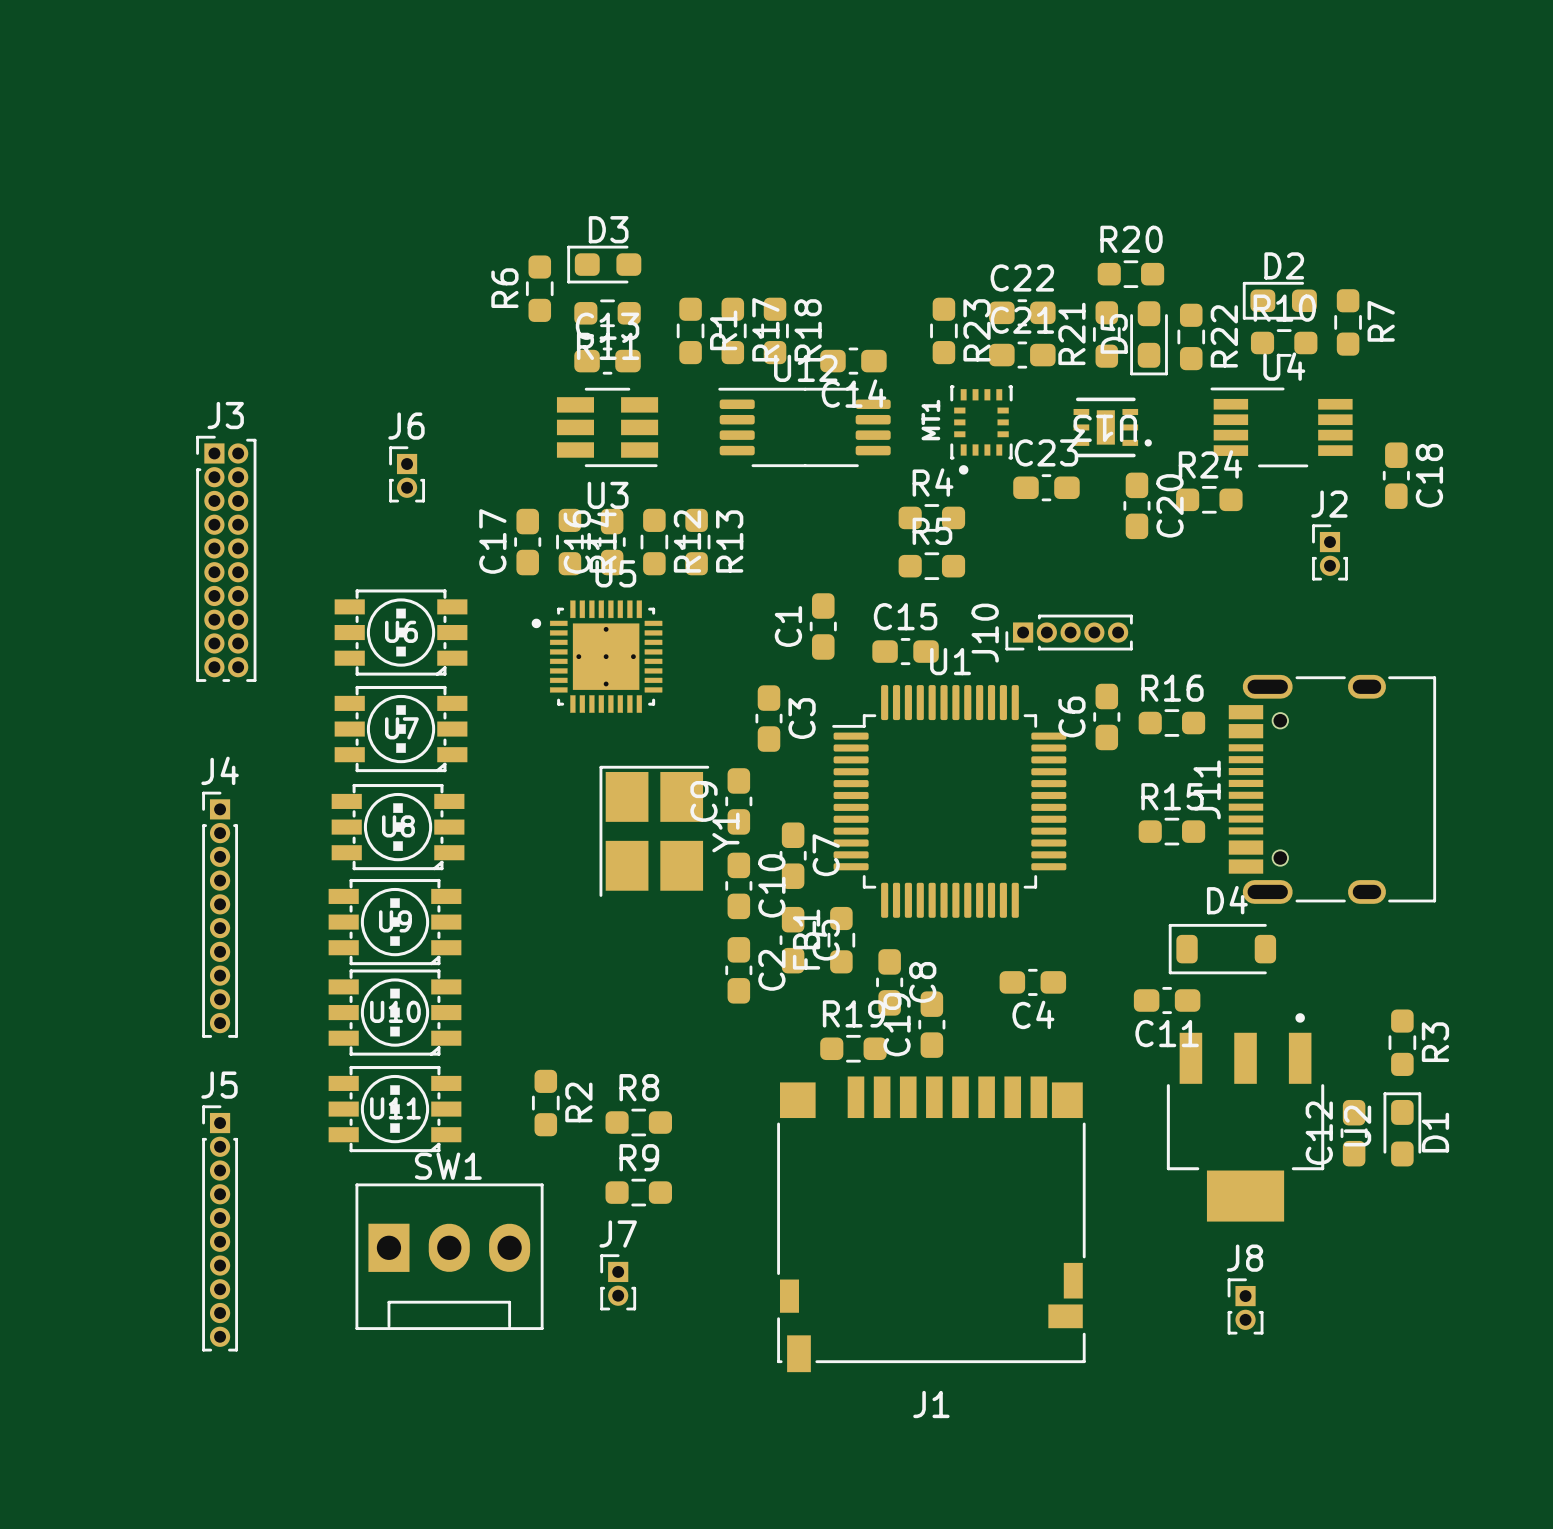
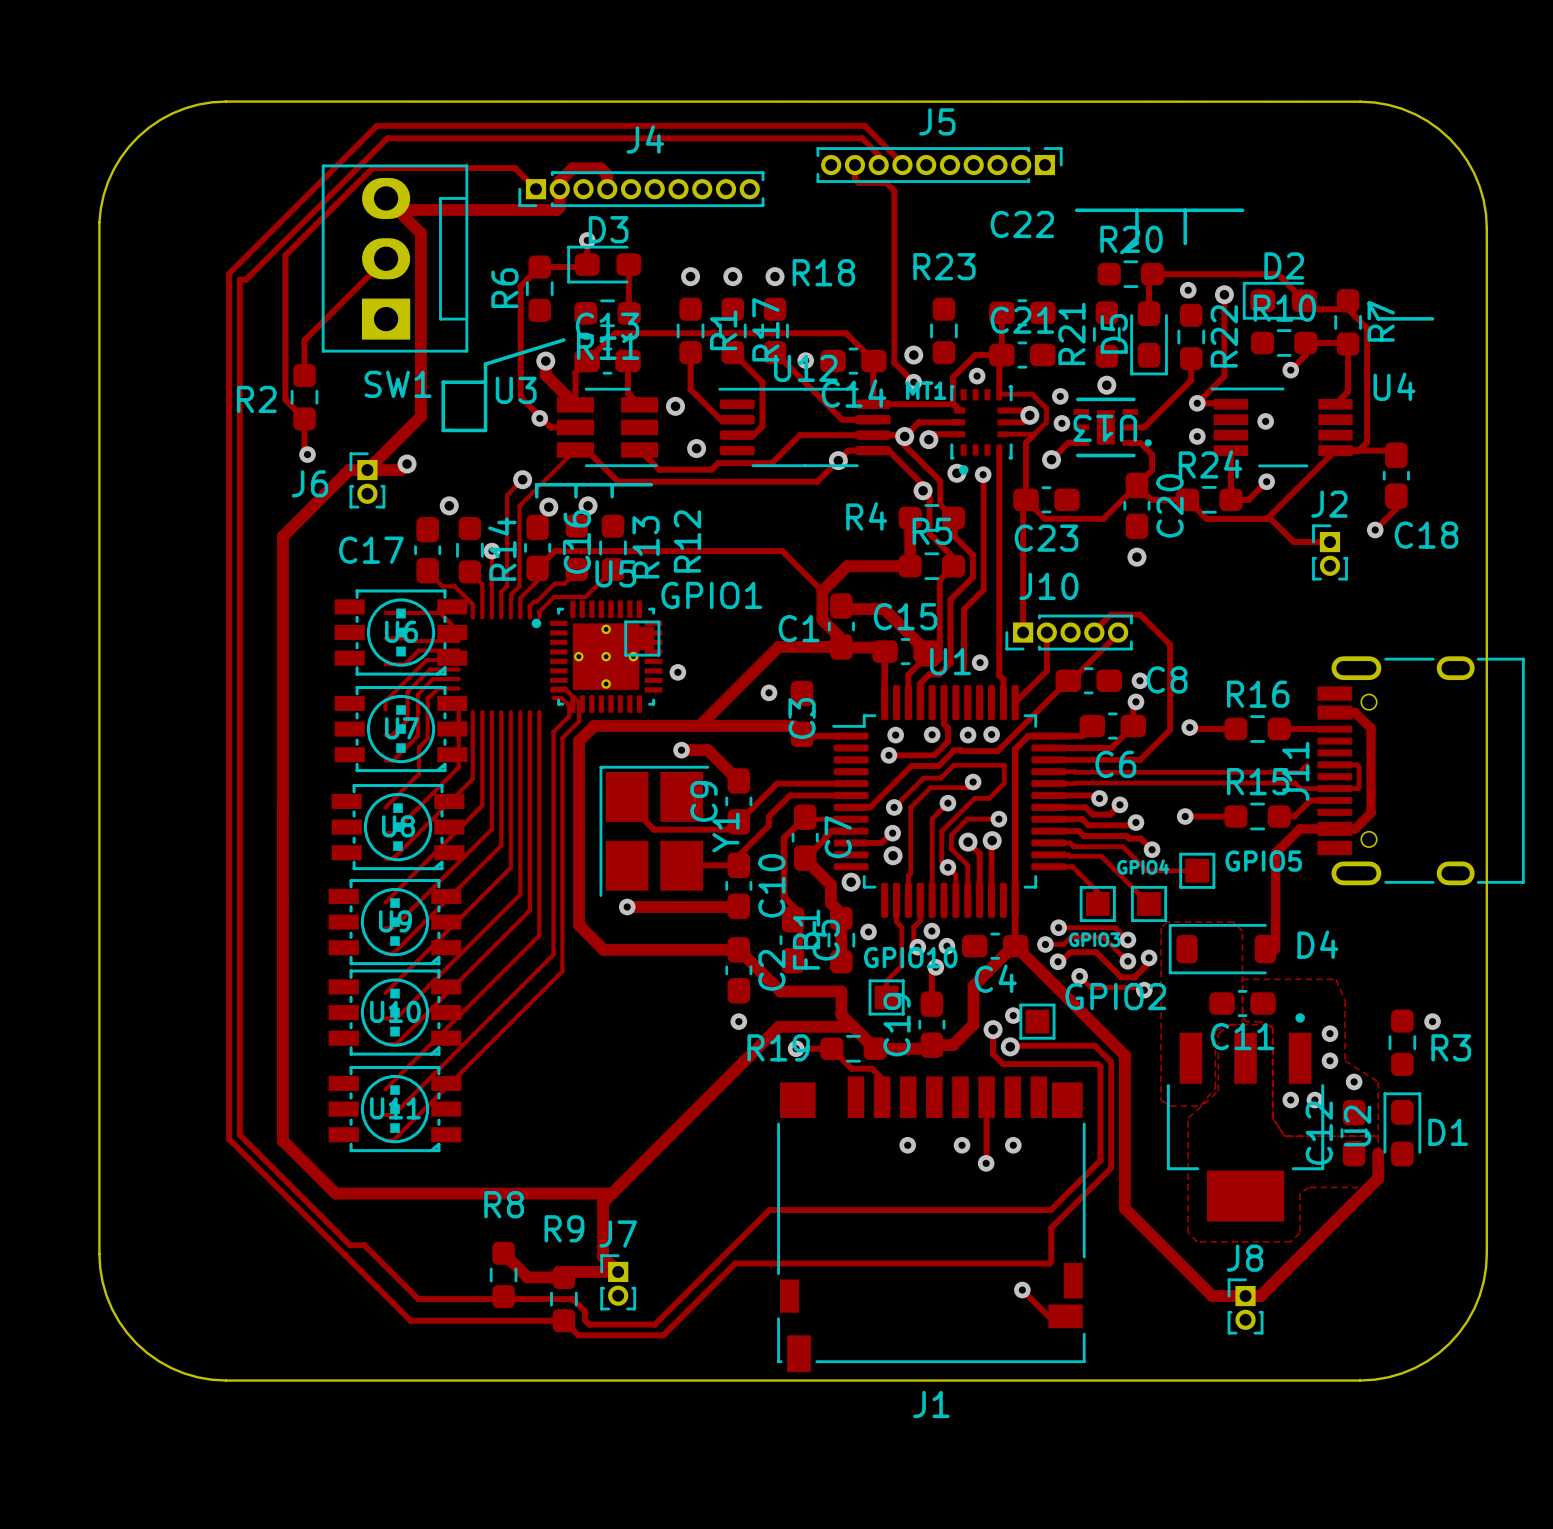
board edge: none -> (226, 101) (1360, 101) (1388, 104) (1401, 108) (1427, 121) (1449, 138) (1467, 160) (1474, 173) (1483, 200) (1486, 228) (1486, 1253) (1483, 1282) (1474, 1308) (1459, 1332) (1449, 1343) (1427, 1361) (1401, 1373) (1374, 1379) (1360, 1380) (226, 1380) (197, 1377) (184, 1373) (158, 1361) (136, 1343) (118, 1321) (111, 1308) (102, 1282) (99, 1253) (99, 222) (108, 182) (120, 157) (138, 136) (172, 113) (198, 104) (226, 101)
track: none -> (854, 165) (854, 179) (858, 182) (886, 182) (894, 190) (894, 362) (913, 382)
track: none -> (878, 165) (878, 154) (862, 138) (387, 138) (246, 279) (239, 279) (239, 1134) (350, 1245) (364, 1245) (418, 1299) (572, 1299) (585, 1311) (585, 1320) (589, 1324) (654, 1324) (769, 1210) (1050, 1210) (1100, 1160) (1100, 1066) (1097, 1064) (1003, 1064) (993, 1053) (993, 1029)
track: none -> (902, 165) (864, 125) (376, 125) (229, 273) (229, 1139) (410, 1320) (563, 1320) (578, 1335) (663, 1335) (735, 1263) (1049, 1263) (1051, 1261) (1051, 1227) (1111, 1167) (1111, 1062) (1094, 1045) (1010, 1046)
track: none -> (536, 189) (514, 168) (372, 168) (285, 255) (285, 399) (304, 418) (304, 451) (307, 454)
track: none -> (607, 189) (607, 174) (600, 168) (572, 168) (559, 181) (559, 206) (556, 209) (397, 209)
track: none -> (386, 198) (420, 233) (420, 416) (367, 470) (349, 470) (282, 536) (282, 1140) (335, 1193) (612, 1193)
line: none -> (1076, 210) (1242, 210)
line: none -> (1136, 210) (1136, 243) (1121, 252)
line: none -> (1185, 210) (1185, 243)
track: none -> (587, 240) (587, 264) (584, 267) (539, 267) (520, 286) (520, 397) (550, 427) (575, 427)
via: none -> (587, 240)
track: none -> (386, 258) (304, 340) (304, 375)
track: none -> (628, 264) (629, 313)
via: none -> (690, 276)
via: none -> (732, 276)
via: none -> (775, 276)
C22 name position: C22 (1022, 277) -> C22 (1022, 224)
via: none -> (1188, 290)
track: none -> (1224, 294) (1224, 376) (1197, 403) (1230, 404)
via: none -> (1224, 294)
line: none -> (1369, 303) (1378, 318) (1432, 318)
track: none -> (1001, 312) (1001, 355) (975, 355) (952, 377) (952, 403) (959, 410)
track: none -> (1149, 313) (1149, 277) (1152, 274) (1277, 274) (1312, 309) (1348, 309) (1367, 328) (1367, 442) (1358, 450)
R18 name rotation: 0° (808, 330) -> 90° clockwise (823, 272)
R23 name rotation: 0° (977, 330) -> 90° clockwise (944, 266)
line: none -> (563, 339) (485, 364) (485, 430) (443, 430) (443, 382) (485, 382)
track: none -> (690, 352) (690, 389) (720, 419) (737, 419)
track: none -> (732, 352) (762, 382) (762, 426) (753, 435) (737, 435)
track: none -> (775, 352) (842, 419) (873, 419)
via: none -> (913, 355)
track: none -> (1191, 358) (1191, 380) (1144, 427) (1130, 427)
via: none -> (805, 360)
track: none -> (545, 361) (545, 375) (575, 404) (575, 372) (614, 333) (846, 333) (873, 361) (873, 404) (953, 404)
via: none -> (545, 361)
track: none -> (628, 361) (628, 393) (639, 404)
track: none -> (999, 363) (999, 394)
U4 name position: U4 (1284, 366) -> U4 (1394, 386)
track: none -> (1290, 370) (1305, 355) (1305, 342) (1338, 342) (1348, 352) (1348, 391) (1335, 404)
via: none -> (1290, 370)
via: none -> (977, 376)
via: none -> (913, 382)
via: none -> (1106, 385)
track: none -> (1000, 394) (1032, 394) (1046, 408) (1046, 422) (1034, 434)
via: none -> (1060, 396)
via: none -> (1197, 403)
via: none -> (675, 406)
track: none -> (1003, 410) (1024, 410) (1029, 415) (1022, 422) (1003, 422)
via: none -> (1029, 415)
via: none -> (539, 418)
MT1 name rotation: 0° (930, 420) -> 90° clockwise (926, 390)
via: none -> (1265, 421)
track: none -> (959, 422) (918, 422) (904, 436)
via: none -> (1061, 423)
J6 name position: J6 (406, 426) -> J6 (309, 483)
track: none -> (959, 434) (934, 434) (928, 439)
track: none -> (1003, 434) (1034, 434)
track: none -> (1034, 434) (1025, 442) (1025, 499)
track: none -> (904, 436) (799, 435) (771, 463) (718, 463) (711, 469) (659, 469) (639, 450)
track: none -> (904, 436) (903, 434) (903, 431) (904, 433) (904, 445) (940, 481) (940, 504) (954, 519) (954, 536) (972, 554) (972, 577) (950, 599) (950, 663) (939, 674) (929, 674) (920, 683) (920, 702)
via: none -> (904, 436)
via: none -> (1197, 436)
via: none -> (928, 439)
track: none -> (1081, 442) (1068, 442) (1051, 459)
track: none -> (1130, 442) (1140, 442) (1152, 454) (1152, 470) (1103, 518) (1044, 518) (1025, 499)
via: none -> (696, 448)
track: none -> (999, 450) (999, 675) (1003, 679) (1003, 702)
track: none -> (1230, 450) (1230, 499)
C23 name position: C23 (1046, 452) -> C23 (1046, 538)
via: none -> (307, 454)
track: none -> (1396, 455) (1391, 450) (1335, 450) (1267, 518)
via: none -> (1051, 459)
via: none -> (838, 460)
track: none -> (407, 464) (401, 470) (370, 470)
via: none -> (407, 464)
via: none -> (956, 473)
J6 position: (407, 474) -> (367, 480)
track: none -> (983, 474) (983, 589) (964, 609) (964, 669)
via: none -> (983, 474)
C18 name rotation: 0° (1429, 475) -> 90° clockwise (1426, 535)
track: none -> (522, 479) (507, 495) (507, 586) (501, 591) (501, 617)
via: none -> (522, 479)
track: none -> (1266, 481) (1248, 499) (1231, 499)
via: none -> (1266, 481)
R4 name position: R4 (932, 482) -> R4 (866, 516)
line: none -> (575, 484) (575, 496)
line: none -> (612, 484) (612, 496)
line: none -> (651, 484) (536, 484) (536, 496)
track: none -> (1136, 485) (1151, 499) (1187, 499) (1206, 518) (1270, 518) (1293, 542) (1329, 542)
C23 position: (1046, 487) -> (1046, 499)
via: none -> (923, 490)
U3 name position: U3 (608, 495) -> U3 (516, 390)
track: none -> (1396, 496) (1396, 508) (1375, 529)
track: none -> (1025, 499) (1023, 502) (1023, 632)
via: none -> (449, 505)
via: none -> (588, 505)
via: none -> (548, 507)
track: none -> (910, 517) (910, 566) (847, 566) (822, 591)
via: none -> (1375, 529)
C17 name rotation: 0° (492, 541) -> 90° clockwise (371, 550)
C17 position: (527, 542) -> (427, 550)
R14 position: (569, 542) -> (469, 550)
C16 position: (612, 542) -> (537, 547)
R12 position: (654, 542) -> (576, 547)
R13 position: (696, 542) -> (613, 547)
track: none -> (491, 551) (491, 617)
via: none -> (491, 551)
via: none -> (1136, 557)
J3: (226, 558) -> none
track: none -> (576, 569) (564, 583) (554, 583) (529, 605) (529, 617)
track: none -> (613, 569) (585, 596) (554, 596) (539, 611) (539, 617)
track: none -> (427, 570) (442, 586) (454, 586) (472, 604) (472, 617)
track: none -> (469, 571) (482, 584) (482, 617)
track: none -> (822, 591) (782, 551) (554, 551) (537, 568) (537, 580) (520, 598) (520, 617)
track: none -> (822, 591) (822, 619) (844, 641) (844, 646) (778, 646) (699, 726)
track: none -> (844, 609) (884, 609) (923, 647) (926, 647)
track: none -> (385, 612) (440, 612) (458, 631)
track: none -> (510, 617) (511, 594) (519, 586) (519, 506) (575, 450) (586, 450) (618, 481) (817, 481) (848, 450) (888, 450) (923, 484) (923, 490) (929, 497) (929, 533) (953, 557) (953, 566) (939, 580) (939, 658) (934, 663) (919, 663) (908, 674) (908, 702)
C1 name rotation: 0° (788, 626) -> 90° clockwise (799, 628)
C1 position: (823, 626) -> (841, 626)
track: none -> (1046, 632) (1046, 670) (1015, 702)
track: none -> (1094, 632) (1110, 614) (1140, 614) (1170, 644) (1170, 729) (1140, 759) (1048, 759)
track: none -> (1118, 632) (1071, 680) (1068, 680) (997, 751) (954, 750) (938, 766) (911, 766) (870, 807) (850, 807)
J10 name rotation: 0° (985, 633) -> 90° clockwise (1048, 586)
track: none -> (385, 638) (406, 638) (409, 641) (458, 641)
GPIO1: none -> (642, 638)
track: none -> (458, 650) (418, 650) (405, 664) (385, 664)
track: none -> (844, 650) (846, 647) (881, 647) (885, 651)
track: none -> (884, 651) (884, 702)
track: none -> (458, 660) (426, 660) (385, 701) (385, 709)
via: none -> (980, 662)
track: none -> (458, 669) (429, 669) (407, 692) (407, 720) (392, 735) (385, 735)
via: none -> (677, 672)
track: none -> (458, 679) (433, 679) (418, 694) (418, 735) (393, 760) (385, 760)
via: none -> (1139, 680)
track: none -> (458, 688) (438, 688) (427, 698) (427, 738) (419, 747) (419, 773) (385, 807)
track: none -> (553, 688) (564, 688) (578, 702) (578, 721) (562, 738) (562, 971) (393, 1140) (385, 1140)
via: none -> (768, 692)
track: none -> (458, 698) (458, 767) (393, 833) (385, 833)
track: none -> (553, 698) (561, 698) (569, 705) (569, 716) (553, 732) (553, 954) (393, 1115) (385, 1115)
track: none -> (1135, 701) (1133, 704) (1133, 726) (1111, 748) (1048, 748)
via: none -> (1135, 701)
track: none -> (944, 702) (944, 724) (948, 728) (948, 741) (934, 755) (888, 755)
track: none -> (472, 712) (472, 779) (393, 858) (385, 858)
track: none -> (482, 712) (482, 805) (385, 902)
track: none -> (491, 712) (491, 829) (393, 928) (385, 928)
track: none -> (501, 712) (501, 845) (393, 953) (385, 953)
track: none -> (510, 712) (510, 867) (385, 992)
track: none -> (520, 712) (520, 894) (396, 1018) (385, 1018)
track: none -> (529, 712) (529, 910) (396, 1044) (385, 1044)
track: none -> (539, 712) (539, 935) (385, 1089)
track: none -> (1334, 712) (1355, 712) (1370, 728) (1370, 813) (1355, 828) (1299, 828) (1275, 853) (1275, 949)
C6 name position: C6 (1071, 716) -> C6 (1115, 764)
C6 rotation: 0° (1106, 716) -> 90° clockwise (1112, 726)
C3 position: (768, 718) -> (802, 713)
R16 position: (1171, 723) -> (1257, 729)
track: none -> (1092, 726) (1082, 736) (1028, 736) (1015, 749) (1015, 946)
track: none -> (1189, 727) (1235, 729)
via: none -> (1189, 727)
track: none -> (1279, 729) (1334, 729)
via: none -> (932, 734)
via: none -> (991, 734)
via: none -> (895, 735)
via: none -> (968, 735)
track: none -> (851, 736) (803, 736) (793, 726) (594, 726) (578, 741) (578, 925) (603, 949) (738, 949) (780, 991) (841, 992)
track: none -> (681, 750) (708, 750) (738, 780)
via: none -> (681, 750)
via: none -> (888, 755)
track: none -> (1307, 764) (1299, 772) (1048, 771)
track: none -> (1334, 764) (1356, 764) (1359, 767) (1357, 788) (1334, 788)
J4 name position: J4 (220, 770) -> J4 (645, 139)
track: none -> (973, 782) (967, 787) (930, 787) (910, 807) (910, 873) (908, 875) (908, 900)
via: none -> (973, 782)
track: none -> (851, 783) (777, 783) (731, 829) (653, 829) (627, 802) (627, 796)
track: none -> (1048, 783) (1295, 783) (1300, 788) (1334, 788)
J11 position: (1332, 789) -> (1421, 770)
track: none -> (851, 795) (790, 795) (768, 816) (768, 825) (738, 855) (738, 865) (681, 865)
track: none -> (1048, 795) (1096, 795) (1099, 798)
via: none -> (1099, 798)
track: none -> (1334, 800) (1310, 800) (1294, 816) (1279, 816)
track: none -> (947, 803) (932, 818) (932, 900)
via: none -> (947, 803)
track: none -> (1119, 804) (1110, 814) (1092, 814) (1085, 807) (1048, 807)
via: none -> (1119, 804)
track: none -> (894, 807) (923, 778) (940, 778) (953, 765) (1004, 765) (1004, 783) (989, 798) (974, 798) (941, 831) (941, 861) (955, 875) (955, 900)
via: none -> (894, 807)
track: none -> (1185, 816) (1235, 816)
via: none -> (1185, 816)
track: none -> (851, 819) (807, 819) (805, 817) (784, 838) (784, 897) (799, 913) (799, 946)
track: none -> (998, 819) (967, 819) (951, 835) (951, 849) (967, 865) (967, 900)
via: none -> (998, 819)
track: none -> (1048, 819) (1082, 819) (1088, 825) (1133, 825) (1135, 822)
via: none -> (1135, 822)
track: none -> (851, 831) (831, 831) (825, 838) (804, 859) (799, 859) (805, 859) (830, 885) (830, 903) (841, 913) (841, 948)
track: none -> (1048, 831) (1078, 831) (1083, 836) (1126, 836) (1129, 838) (1140, 838) (1152, 849)
R15 position: (1171, 831) -> (1257, 816)
track: none -> (892, 833) (881, 842) (851, 842)
via: none -> (892, 833)
track: none -> (992, 840) (991, 900)
via: none -> (992, 840)
track: none -> (968, 842) (979, 853) (979, 900)
via: none -> (968, 842)
track: none -> (1048, 842) (1069, 842) (1073, 846) (1122, 846) (1147, 870) (1197, 870)
via: none -> (1152, 849)
track: none -> (1048, 854) (1101, 856) (1149, 903)
C7 position: (793, 855) -> (805, 837)
via: none -> (893, 855)
track: none -> (1048, 866) (1072, 866) (1097, 891) (1097, 903)
via: none -> (947, 867)
GPIO5: none -> (1197, 870)
via: none -> (851, 882)
track: none -> (896, 900) (896, 922) (901, 927) (901, 965) (886, 980) (886, 997)
track: none -> (920, 900) (920, 920) (913, 927) (913, 943) (917, 947)
D4 name position: D4 (1227, 900) -> D4 (1317, 944)
GPIO3: none -> (1097, 903)
GPIO4: none -> (1149, 903)
track: none -> (738, 906) (627, 907)
via: none -> (627, 907)
J4 rotation: 0° (220, 914) -> 90° counterclockwise (641, 189)
J4 position: (220, 914) -> (641, 189)
track: none -> (1058, 927) (1115, 927) (1130, 943)
via: none -> (1058, 927)
via: none -> (868, 931)
via: none -> (931, 931)
via: none -> (1127, 939)
track: none -> (1045, 944) (1063, 944) (1070, 937) (1103, 937) (1127, 961)
via: none -> (1045, 944)
via: none -> (946, 946)
track: none -> (1015, 946) (1013, 946) (973, 985) (973, 1024) (953, 1045) (931, 1045) (928, 1048) (875, 1048) (841, 1015) (841, 992)
track: none -> (1015, 946) (1124, 1055) (1124, 1208) (1212, 1296) (1260, 1296) (1378, 1178) (1378, 1153)
via: none -> (917, 947)
track: none -> (1149, 957) (1149, 962) (1134, 977) (1121, 977) (1096, 952) (1070, 952) (1060, 961) (1058, 961)
via: none -> (1149, 957)
via: none -> (1058, 961)
via: none -> (1127, 961)
track: none -> (935, 967) (931, 971) (931, 1004) (930, 1002)
via: none -> (935, 967)
track: none -> (1079, 976) (1090, 987) (1141, 987) (1144, 990)
via: none -> (1079, 976)
zone outline: none -> (1242, 979) (1336, 979) (1345, 1000) (1345, 1060) (1378, 1081) (1378, 1178) (1369, 1187) (1308, 1187) (1299, 1193) (1299, 1232) (1290, 1241) (1197, 1241) (1188, 1232) (1188, 1118) (1218, 1090) (1218, 1033) (1230, 1024)
C8 rotation: 0° (889, 982) -> 90° clockwise (1088, 680)
C8 position: (889, 982) -> (1088, 680)
C4 position: (1032, 982) -> (995, 946)
via: none -> (1144, 990)
GPIO10: none -> (886, 997)
C11 position: (1167, 1000) -> (1242, 1003)
zone outline: none -> (1242, 1012) (1245, 1021) (1260, 1021) (1272, 1027) (1272, 1118) (1284, 1136) (1378, 1136)
R19 name position: R19 (854, 1013) -> R19 (778, 1047)
via: none -> (1013, 1015)
via: none -> (738, 1021)
GPIO2: none -> (1037, 1021)
via: none -> (1432, 1021)
zone outline: none -> (1242, 1024) (1242, 931) (1233, 922) (1167, 922) (1161, 928) (1161, 1100) (1170, 1106) (1200, 1106) (1215, 1087) (1215, 1030) (1227, 1024) (1266, 1024)
track: none -> (853, 1026) (778, 1026) (603, 1202) (603, 1256) (618, 1271)
via: none -> (993, 1029)
via: none -> (1329, 1033)
R3 name rotation: 0° (1435, 1042) -> 90° clockwise (1451, 1047)
via: none -> (1010, 1046)
track: none -> (796, 1048) (831, 1048) (851, 1068) (872, 1068) (882, 1078) (882, 1097)
via: none -> (796, 1048)
via: none -> (1329, 1060)
via: none -> (1354, 1081)
J5 name position: J5 (219, 1085) -> J5 (937, 121)
track: none -> (986, 1097) (986, 1163)
via: none -> (1290, 1100)
via: none -> (1314, 1100)
R2 name rotation: 0° (578, 1102) -> 90° clockwise (256, 399)
R2 name position: R2 (578, 1102) -> R2 (256, 399)
R2 position: (545, 1103) -> (304, 397)
R8 rotation: 0° (638, 1122) -> 90° clockwise (503, 1274)
R8 position: (638, 1122) -> (503, 1274)
D1 name rotation: 0° (1435, 1132) -> 90° clockwise (1448, 1132)
via: none -> (907, 1145)
via: none -> (962, 1145)
via: none -> (1013, 1145)
via: none -> (986, 1163)
SW1 name position: SW1 (448, 1166) -> SW1 (398, 384)
R9 rotation: 0° (638, 1192) -> 90° clockwise (563, 1299)
R9 position: (638, 1192) -> (563, 1299)
J5 rotation: 0° (220, 1228) -> 90° clockwise (939, 165)
J5 position: (220, 1228) -> (939, 165)
track: none -> (503, 1253) (527, 1277) (563, 1277) (569, 1271) (618, 1271)
SW1 rotation: 0° (449, 1256) -> 90° counterclockwise (394, 258)
SW1 position: (449, 1256) -> (394, 258)
track: none -> (1022, 1290) (1048, 1316) (1065, 1316)
via: none -> (1022, 1290)

